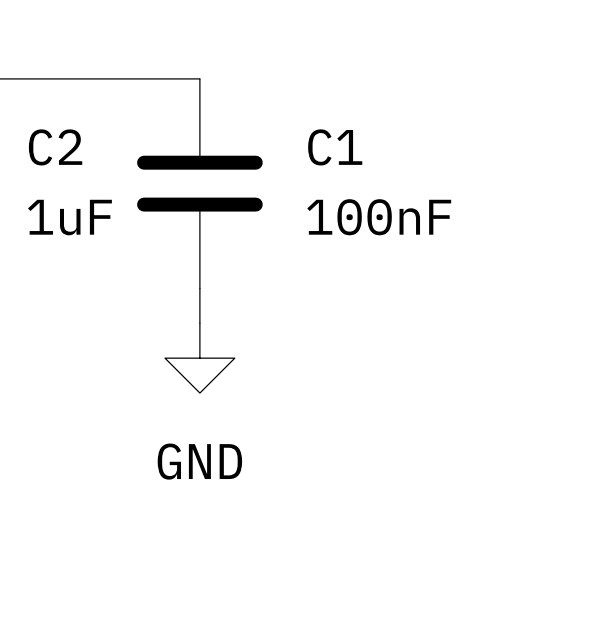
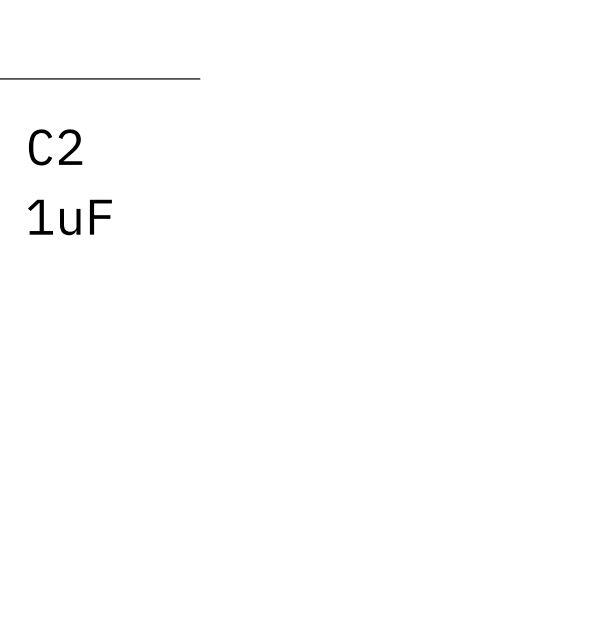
C1: 100nF (199, 183) -> none
wire: (199, 288) (199, 323) -> none
power symbol: GND (199, 358) -> none

